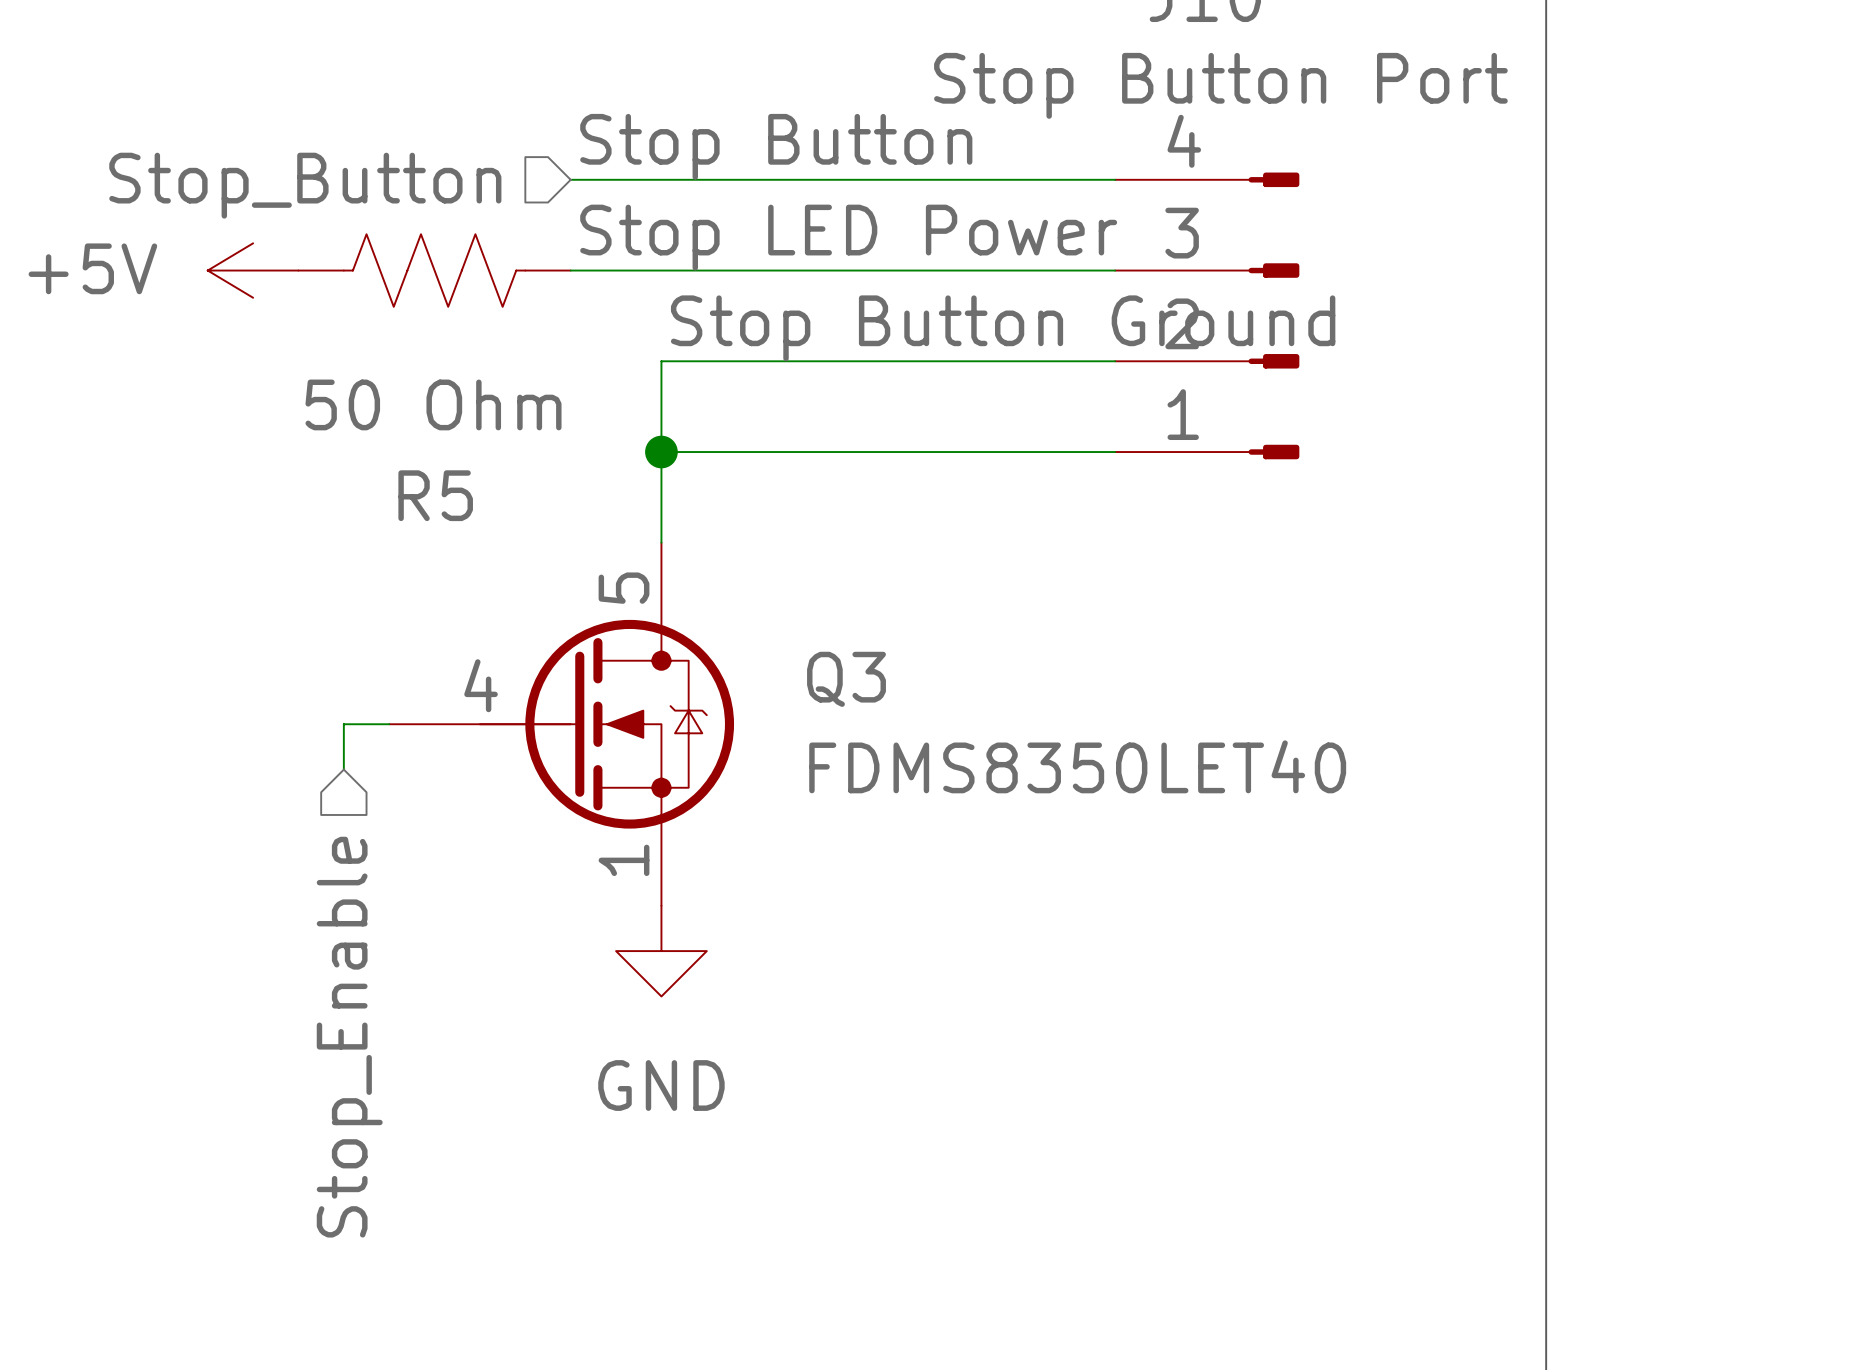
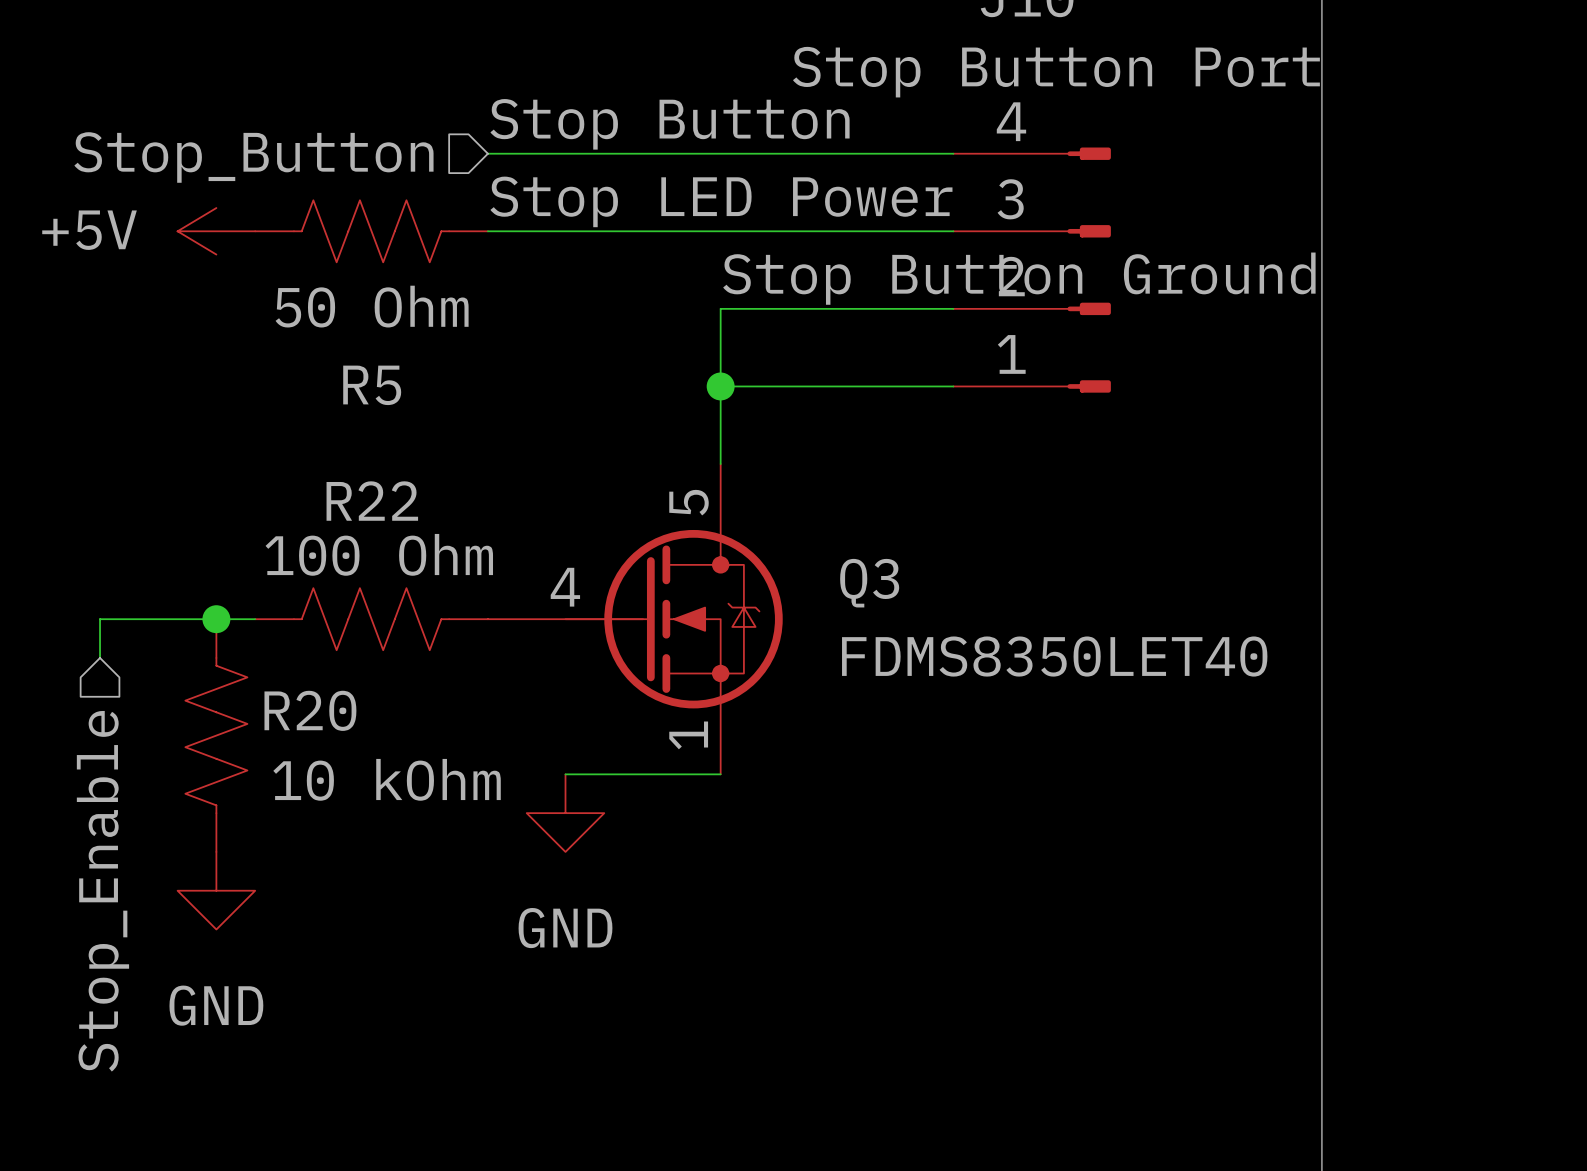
label position: Stop Button Ground (1003, 328) -> Stop Button Ground (1019, 278)
wire: (842, 361) (661, 361) (661, 542) -> (720, 308) (720, 464)
R5 value position: 50 Ohm (433, 404) -> 50 Ohm (372, 306)
wire: (661, 452) (842, 452) -> (565, 774) (720, 774)
junction position: (661, 452) -> (720, 386)
R5 name position: R5 (435, 495) -> R5 (372, 385)
junction: none -> (216, 619)
wire: none -> (255, 619) (100, 619) (100, 657)
wire: (389, 724) (343, 724) (343, 769) -> none
R22: none -> 100 Ohm (371, 619)
Q3 position: (561, 724) -> (635, 619)
R20: none -> 10 kOhm (216, 735)
hierarchical label position: Stop_Enable (349, 1037) -> Stop_Enable (102, 891)
power symbol: none -> GND (216, 890)

